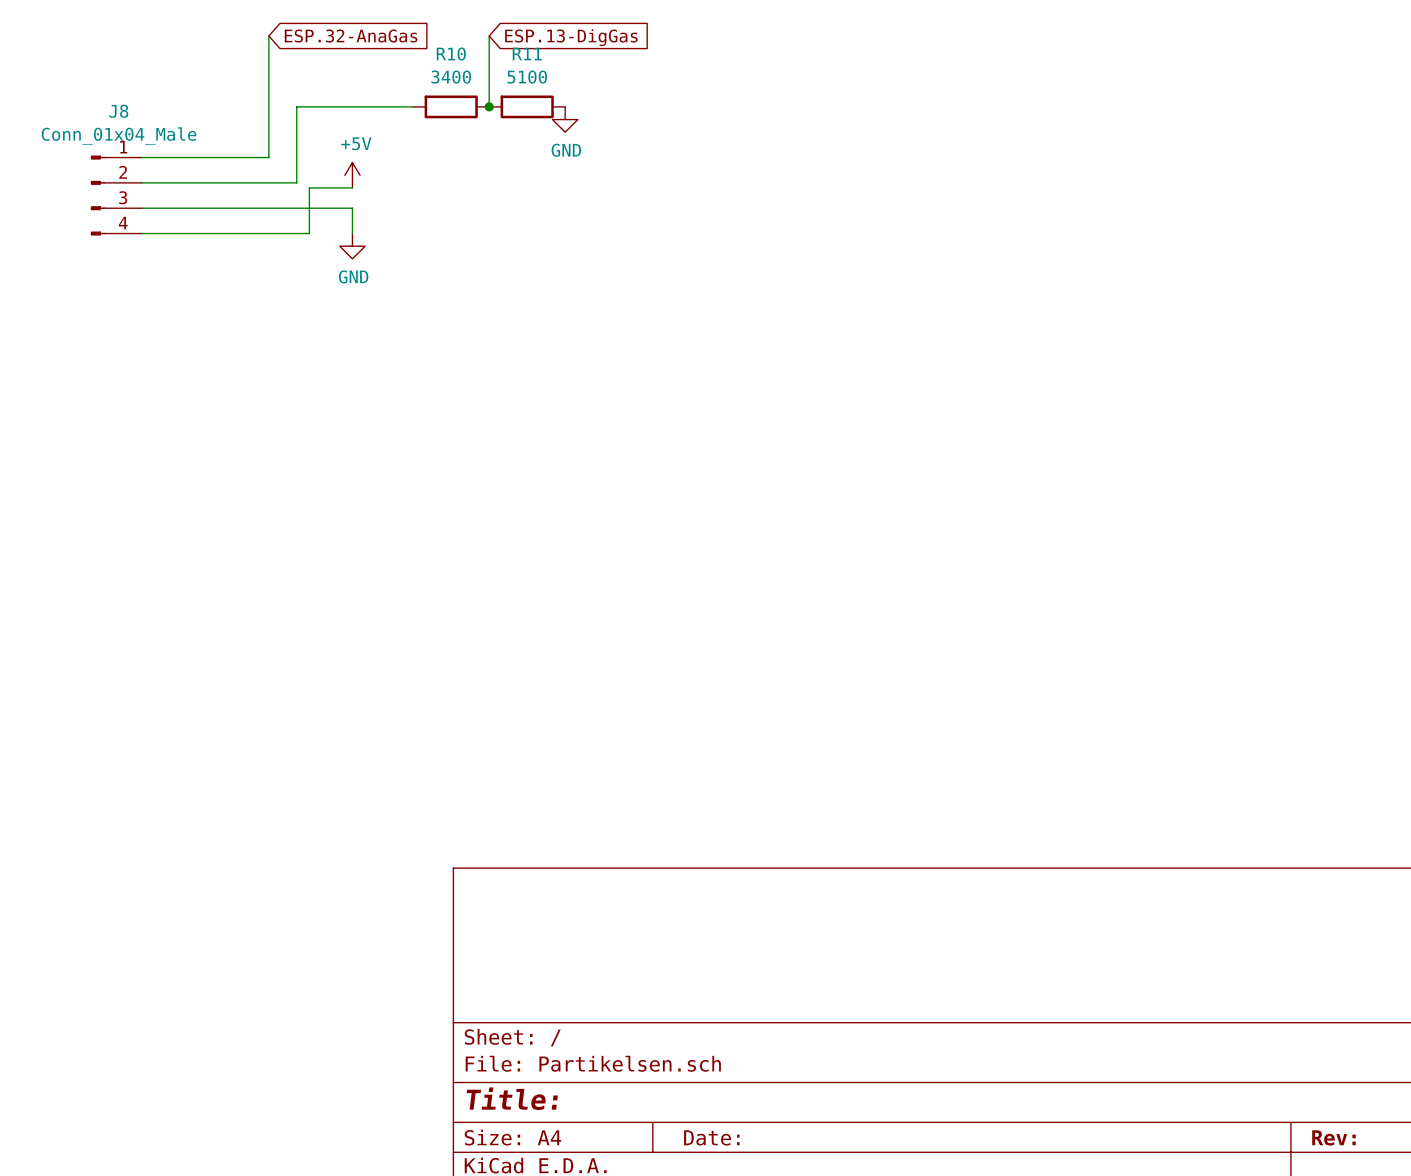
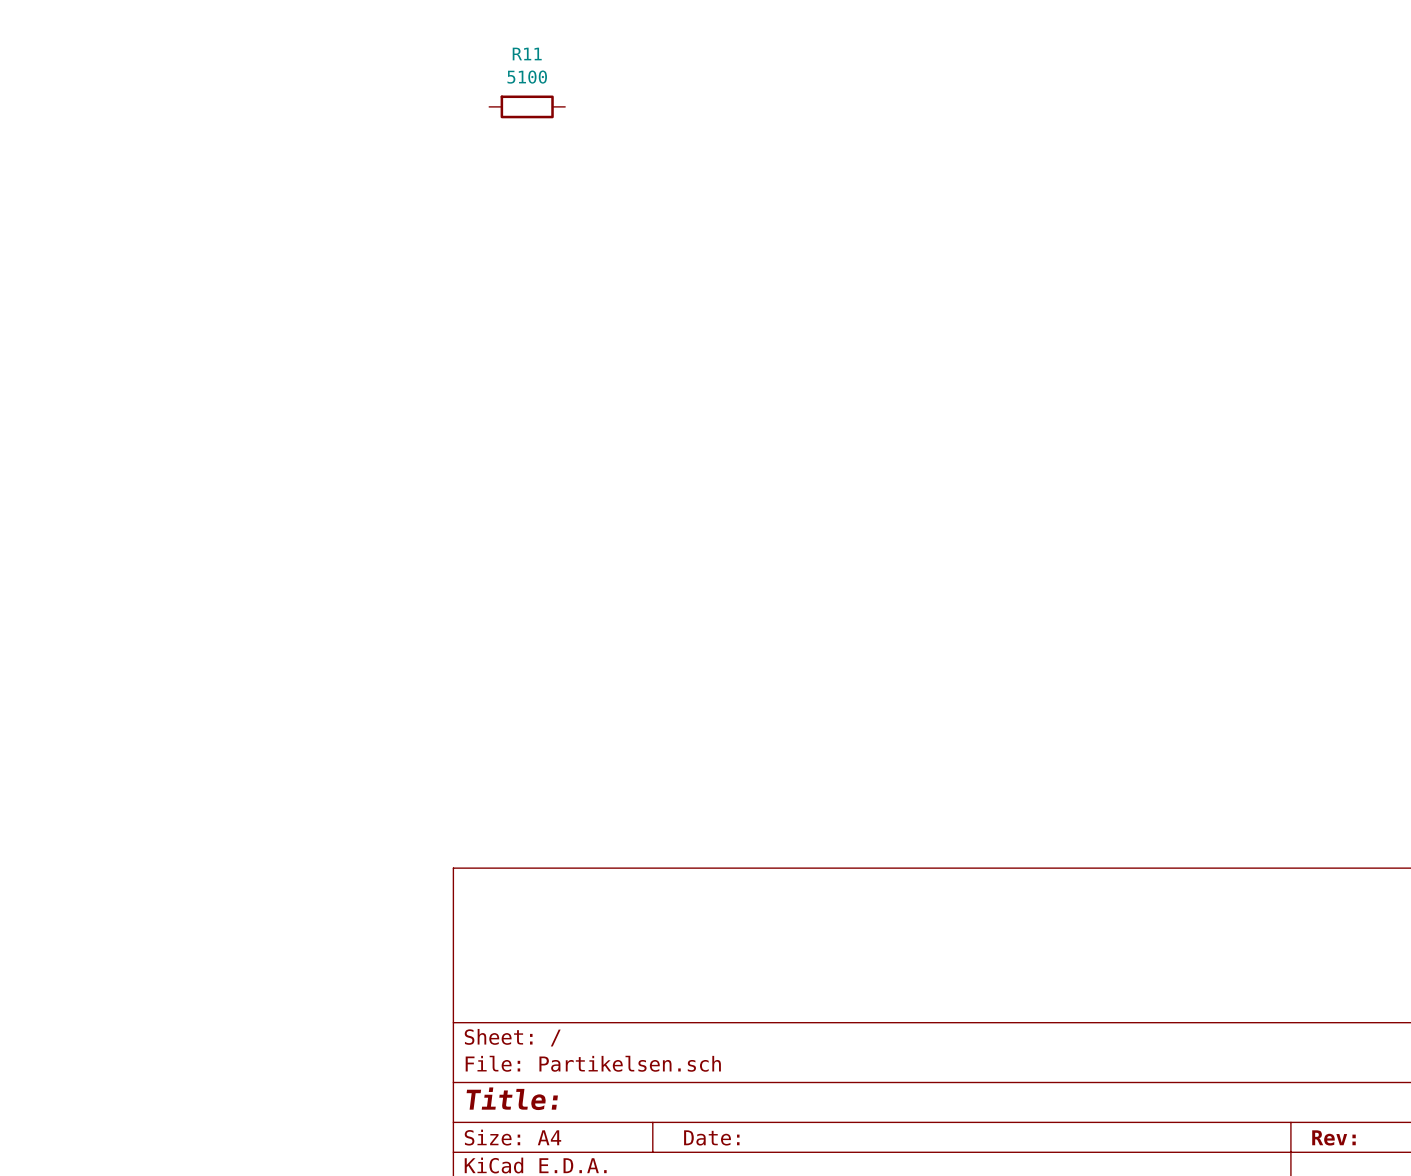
wire: (268, 35) (268, 157) (142, 157) -> none
wire: (489, 35) (489, 106) -> none
global label: ESP.32-AnaGas (351, 36) -> none
global label: ESP.13-DigGas (571, 37) -> none
wire: (413, 106) (296, 106) (296, 182) (142, 182) -> none
R10: 3400 (451, 106) -> none
junction: (489, 106) -> none
power symbol: GND (565, 119) -> none
power symbol: +5V (352, 175) -> none
wire: (352, 187) (309, 187) (309, 233) (142, 233) -> none
J8: Conn_01x04_Male (116, 195) -> none
wire: (142, 208) (352, 208) (352, 233) -> none
power symbol: GND (352, 246) -> none

